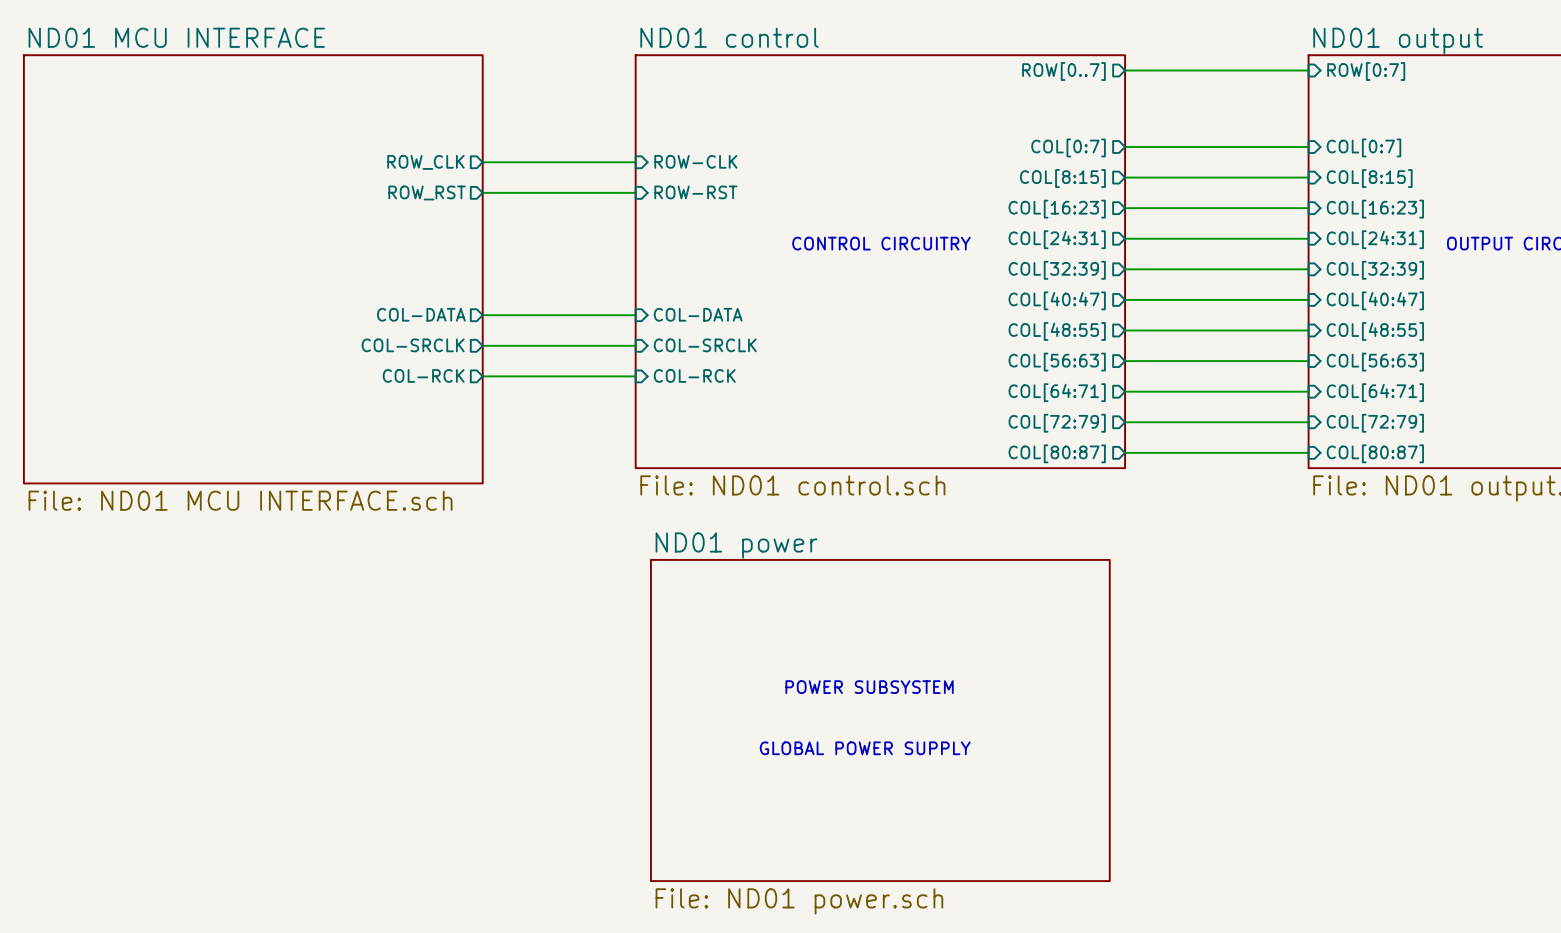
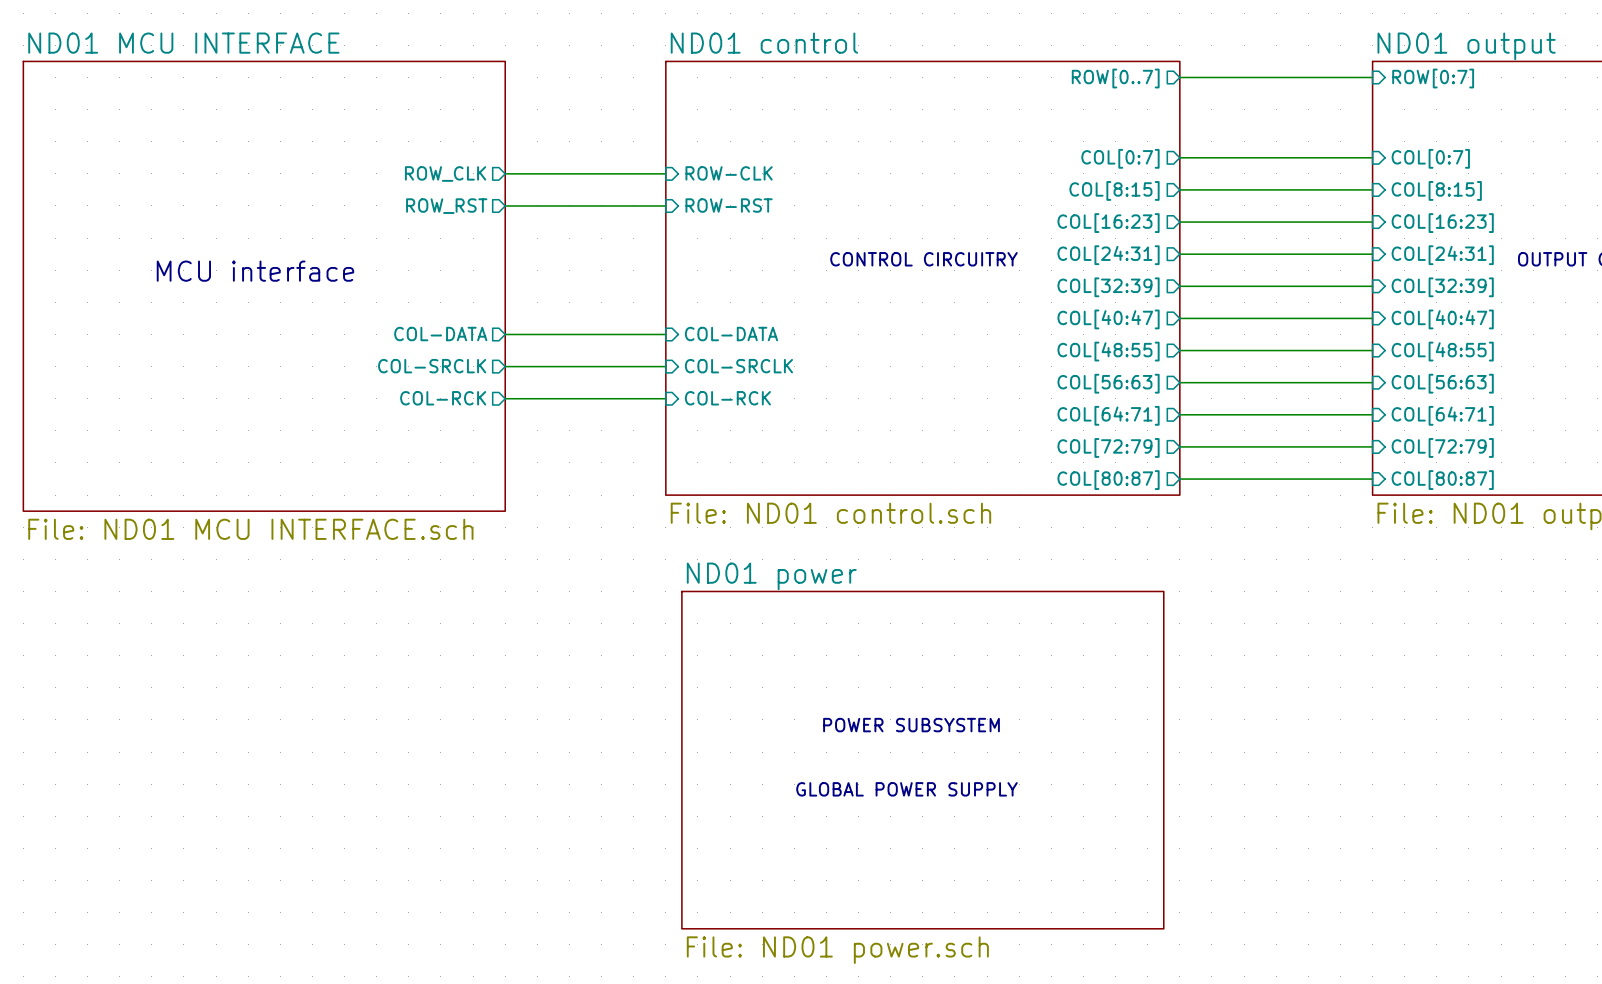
text: none -> MCU interface (255, 271)

